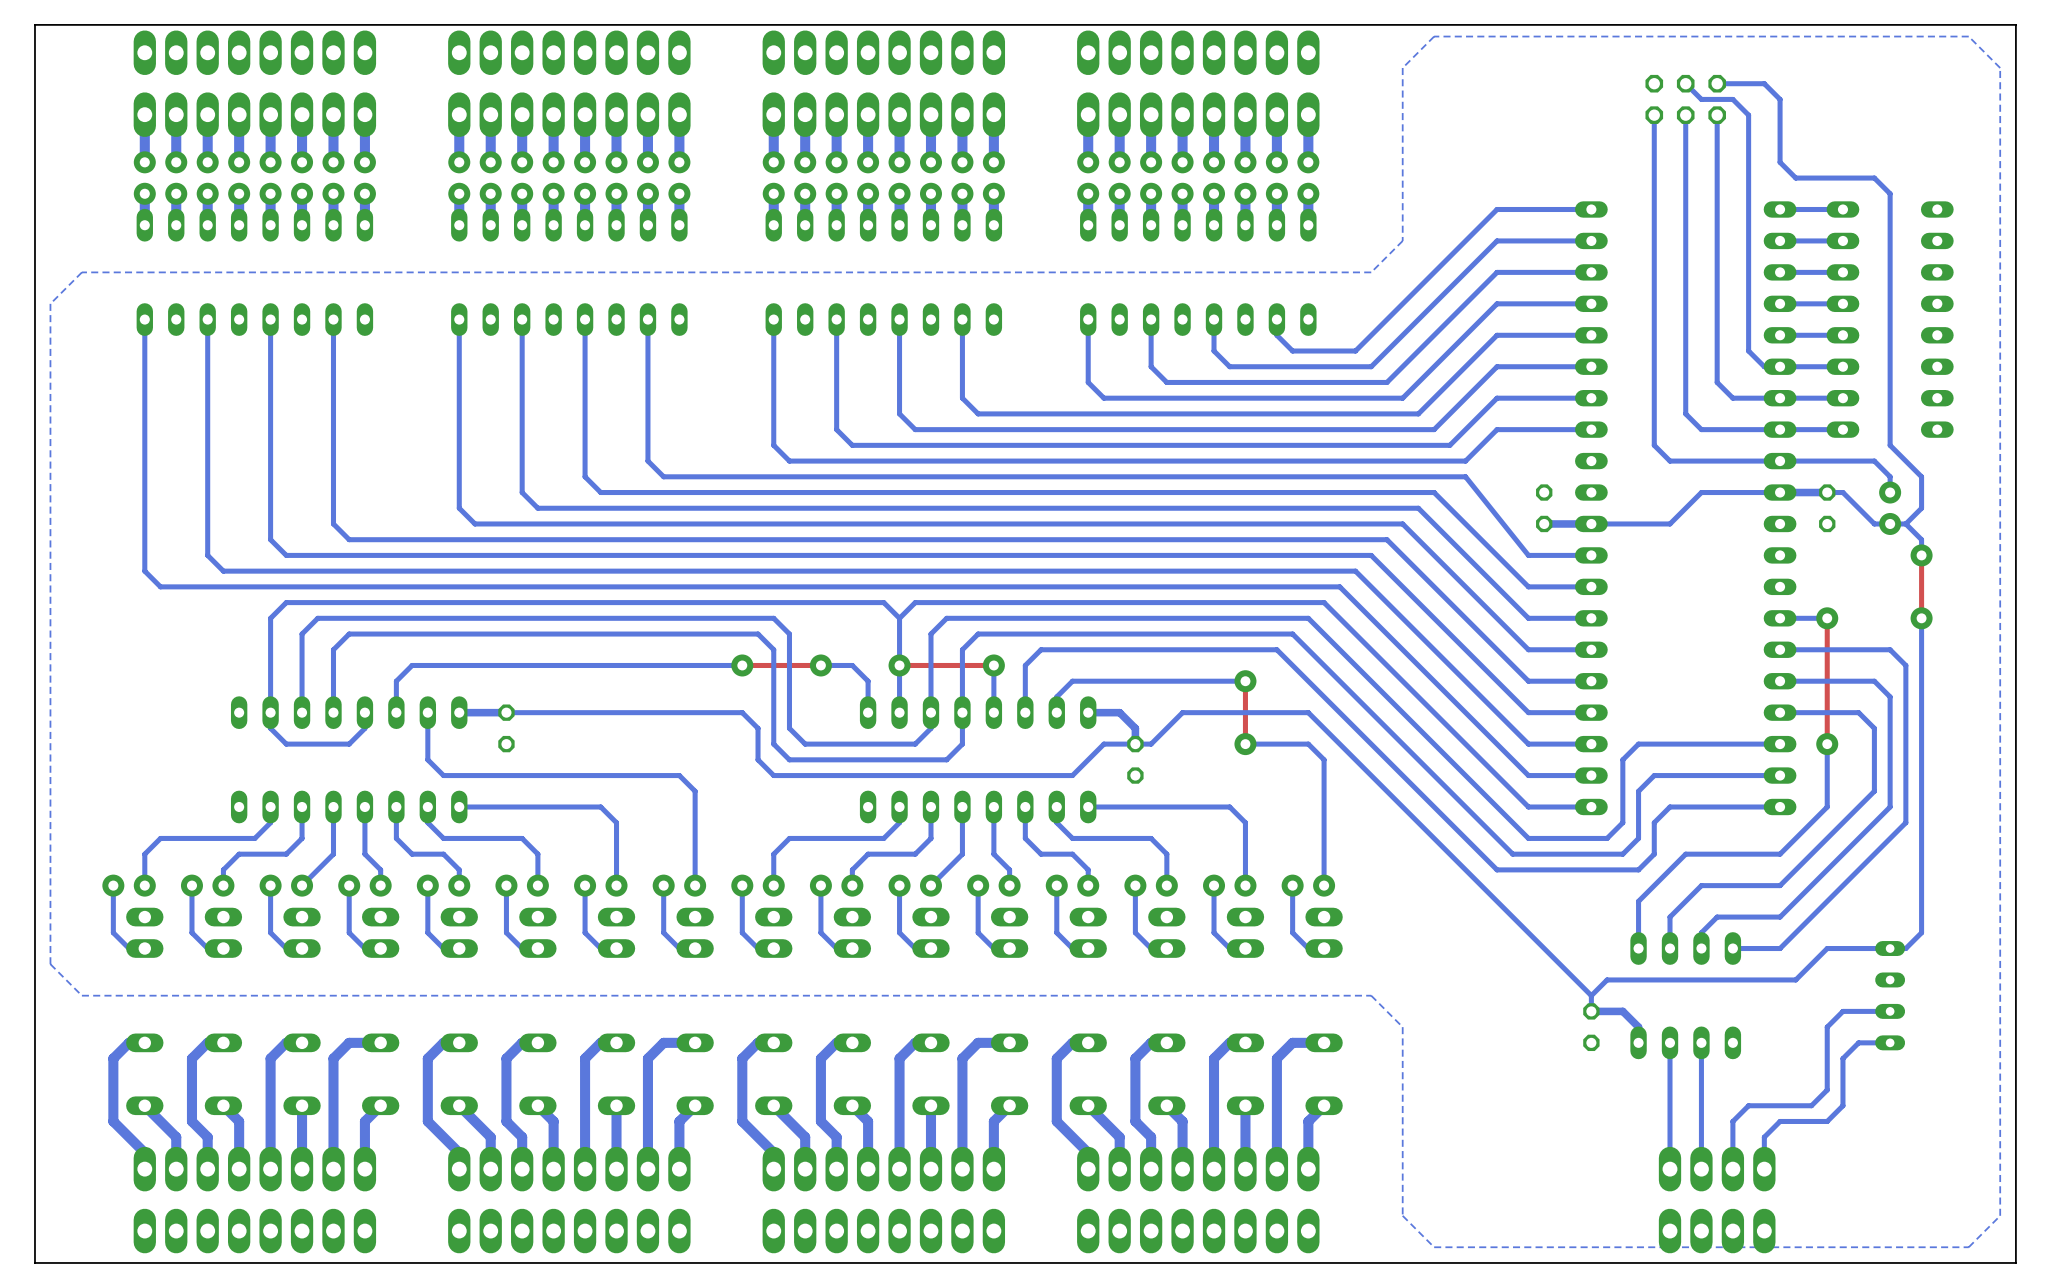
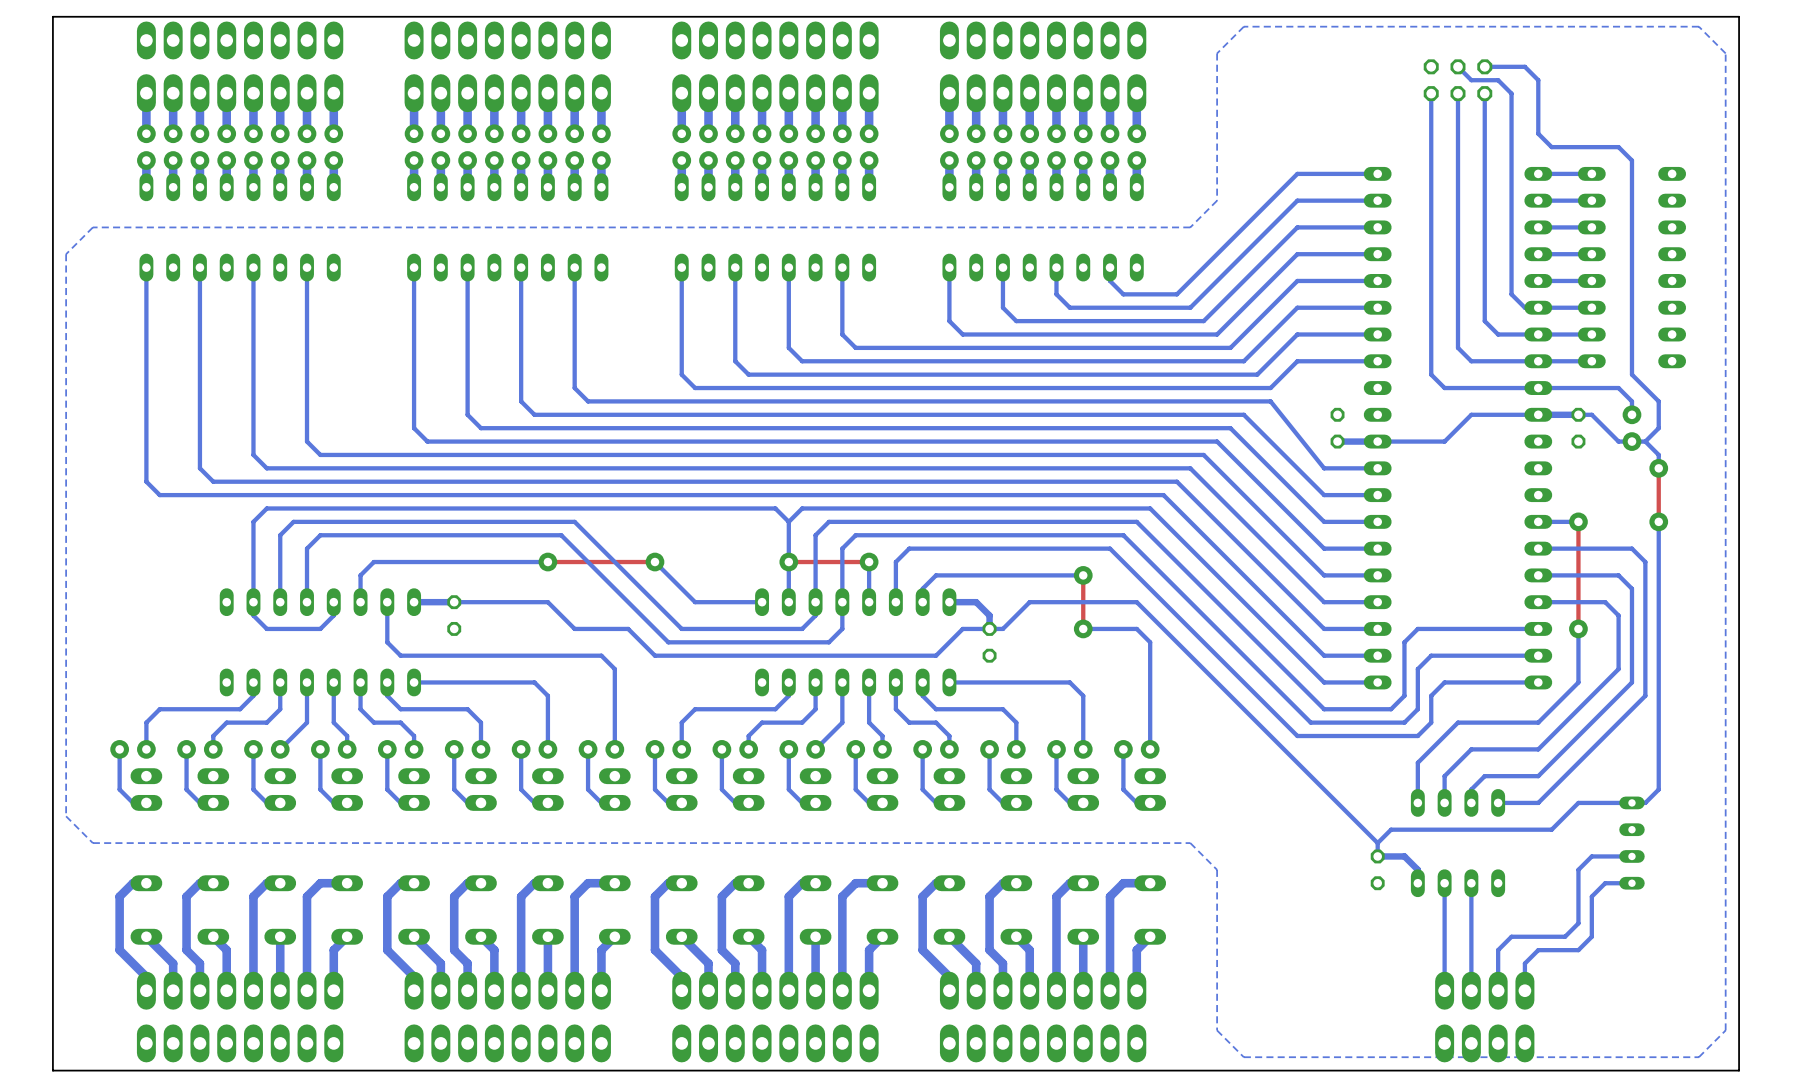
bottom track: (647, 618) (773, 618) (789, 634) (789, 728) (805, 744) -> (574, 521) (654, 602)
bottom track: (632, 634) (758, 634) (773, 649) (773, 744) (789, 759) -> (561, 535) (668, 642) (695, 642)
via: none -> (547, 562)
bottom track: (742, 665) (616, 665) -> none
bottom track: (820, 665) (852, 665) (868, 681) (868, 712) -> (654, 562) (695, 602) (762, 602)
top track: (820, 665) (742, 665) -> (547, 562) (654, 562)
via: (820, 665) -> none
bottom track: (742, 712) (616, 712) -> (681, 655) (654, 655) (628, 628) (574, 628) (547, 602)
bottom track: (758, 728) (758, 759) (773, 775) -> (668, 615) (681, 628) (708, 628)

